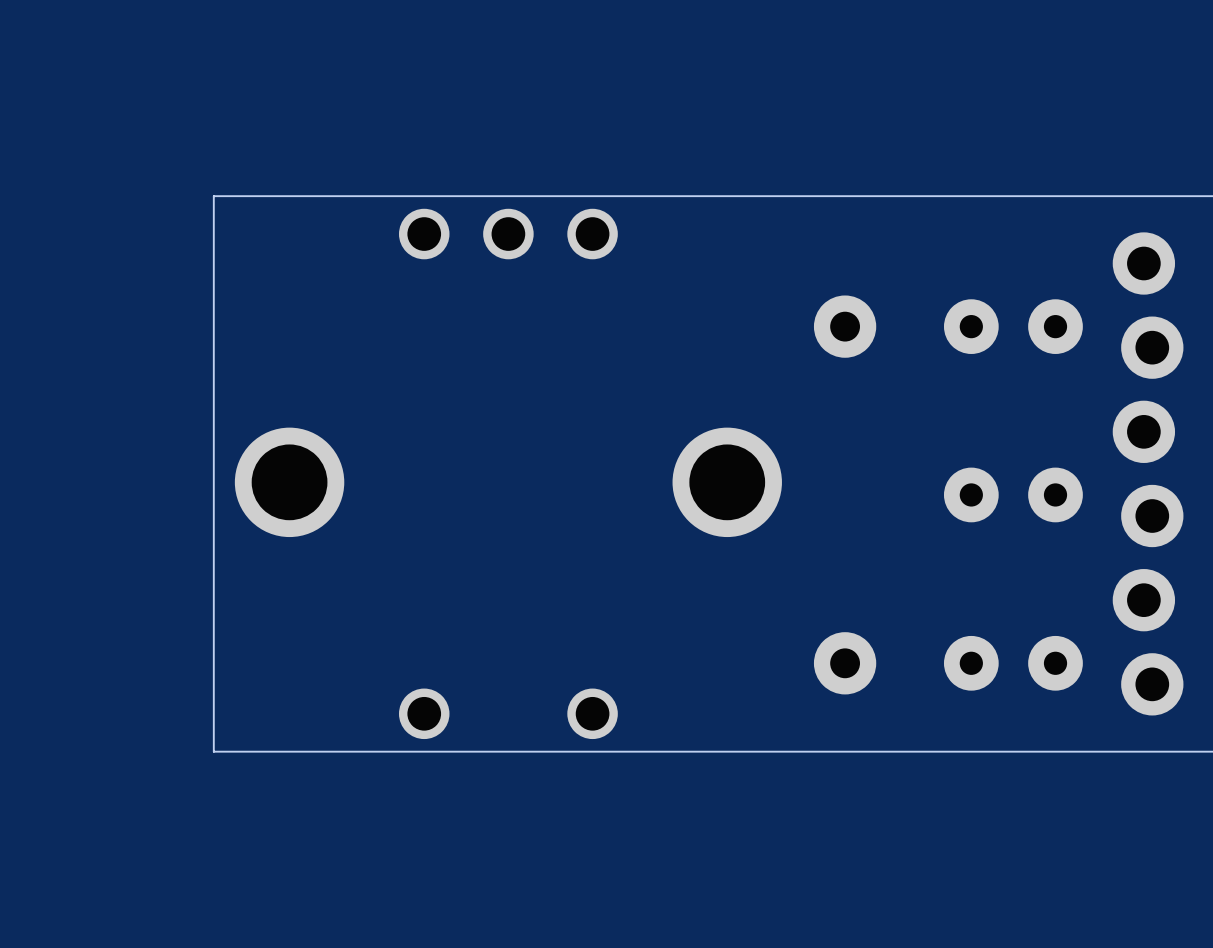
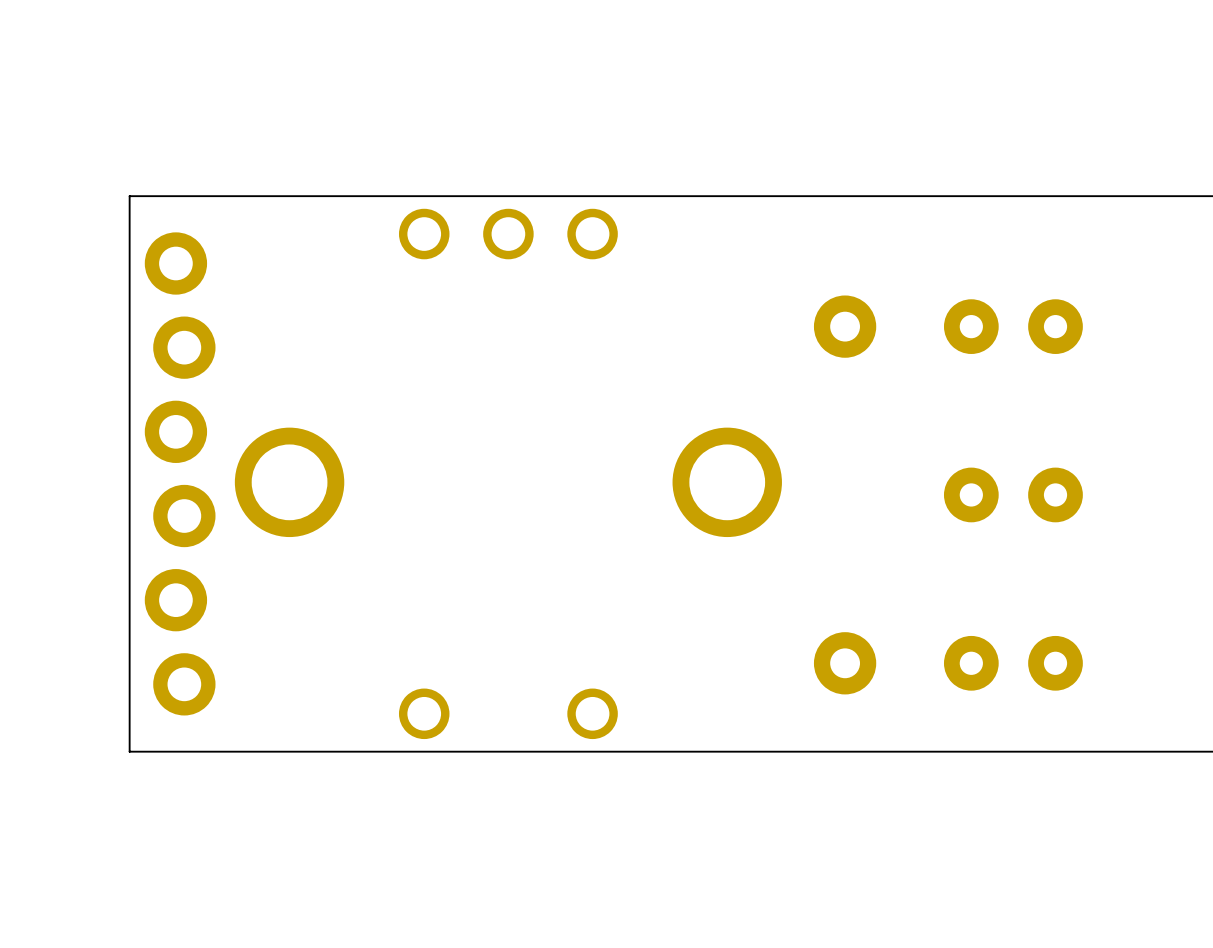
board edge: (213, 196) (213, 751) -> (213, 196) (129, 196) (129, 751) (213, 751)
part: none -> (180, 473)
part: (1148, 473) -> none

